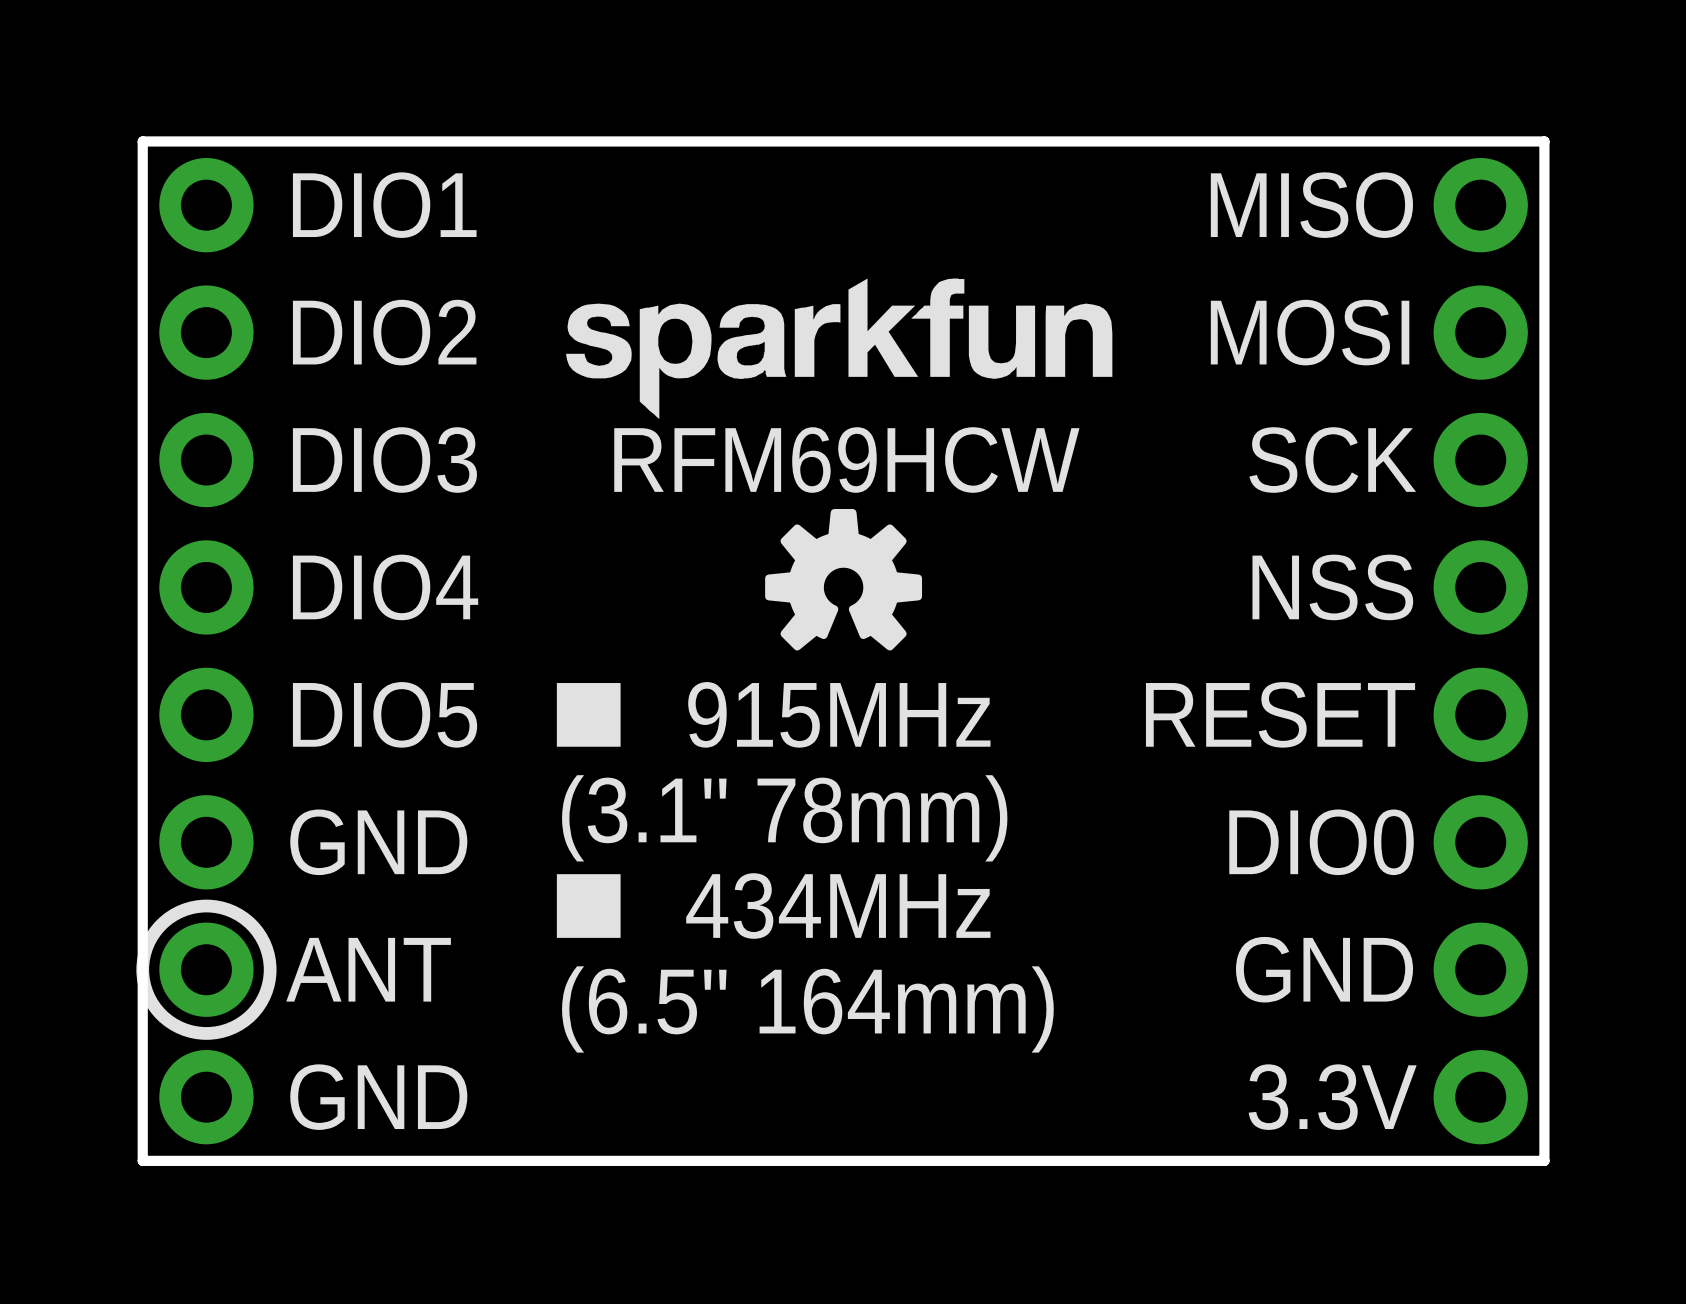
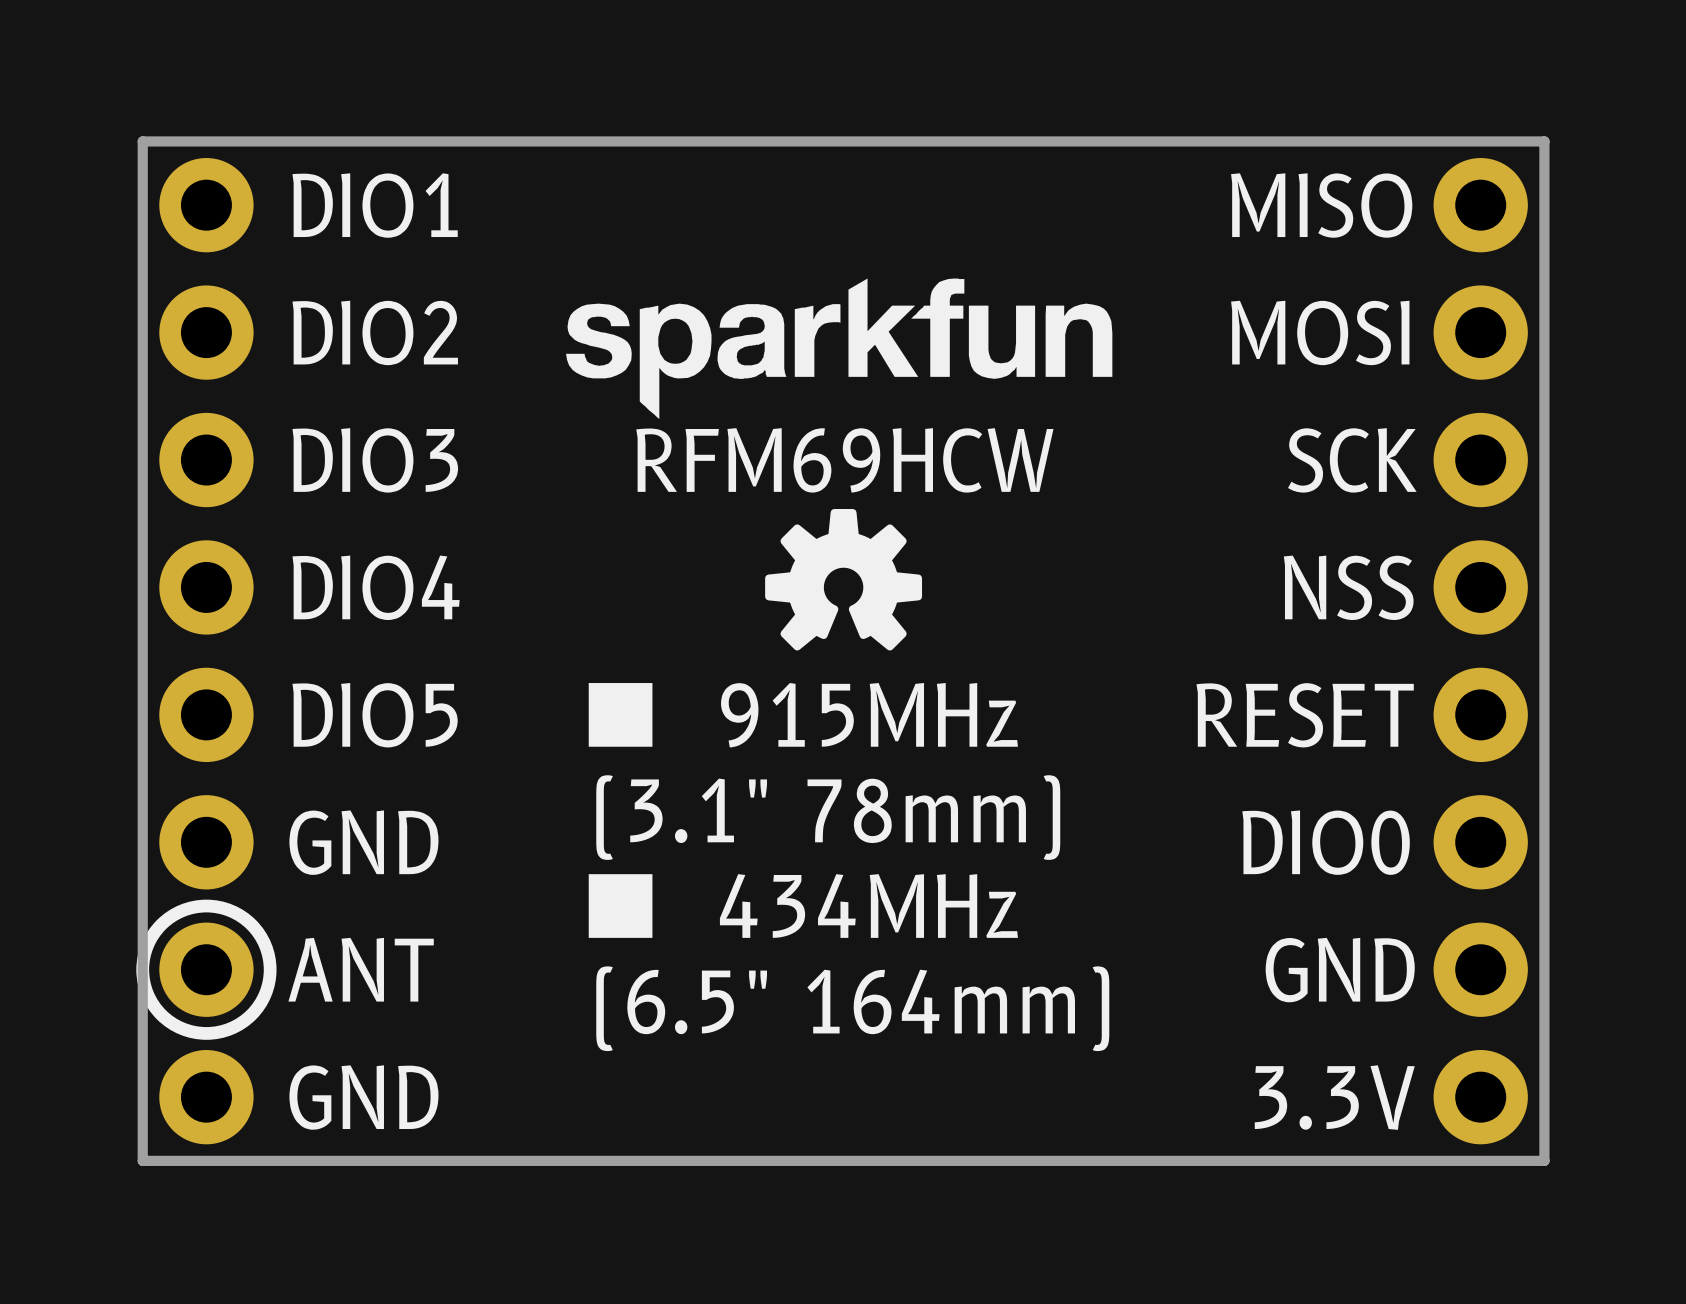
drawing position: (588, 714) -> (620, 714)
text position: 915MHz (839, 714) -> 915MHz (869, 715)
text position: (3.1" 78mm) (784, 818) -> (3.1" 78mm) (828, 817)
drawing position: (588, 906) -> (620, 906)
text position: 434MHz (838, 906) -> 434MHz (868, 906)
text position: (6.5" 164mm) (807, 1009) -> (6.5" 164mm) (852, 1008)

